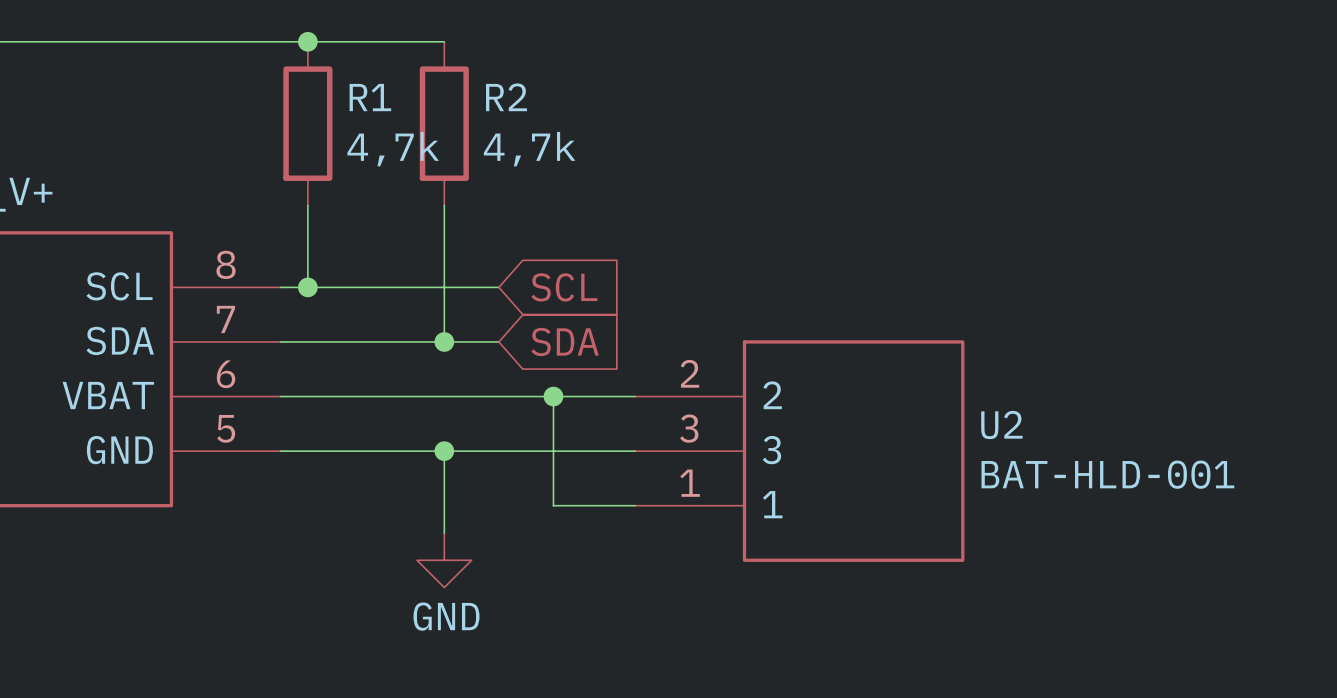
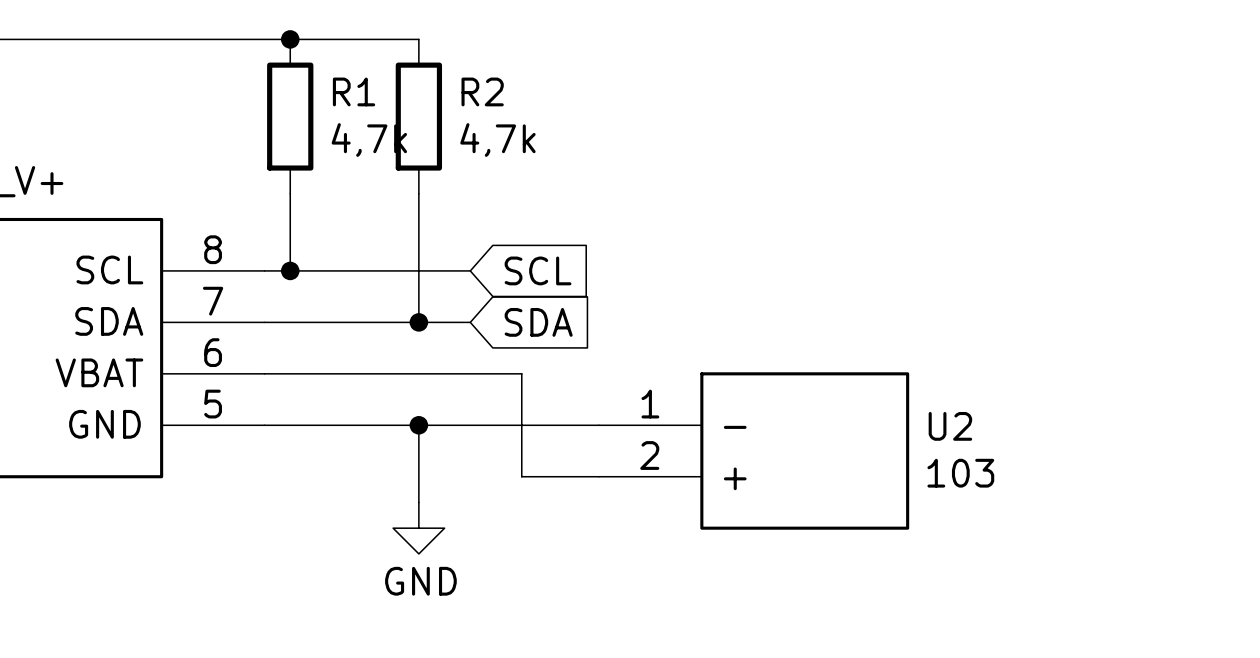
U2 symbol: [635, 340, 965, 562] -> [598, 372, 910, 530]
wire: (553, 396) (635, 396) -> none
junction: (553, 396) -> none
U2 value: BAT-HLD-001 (1107, 474) -> 103 (960, 473)

